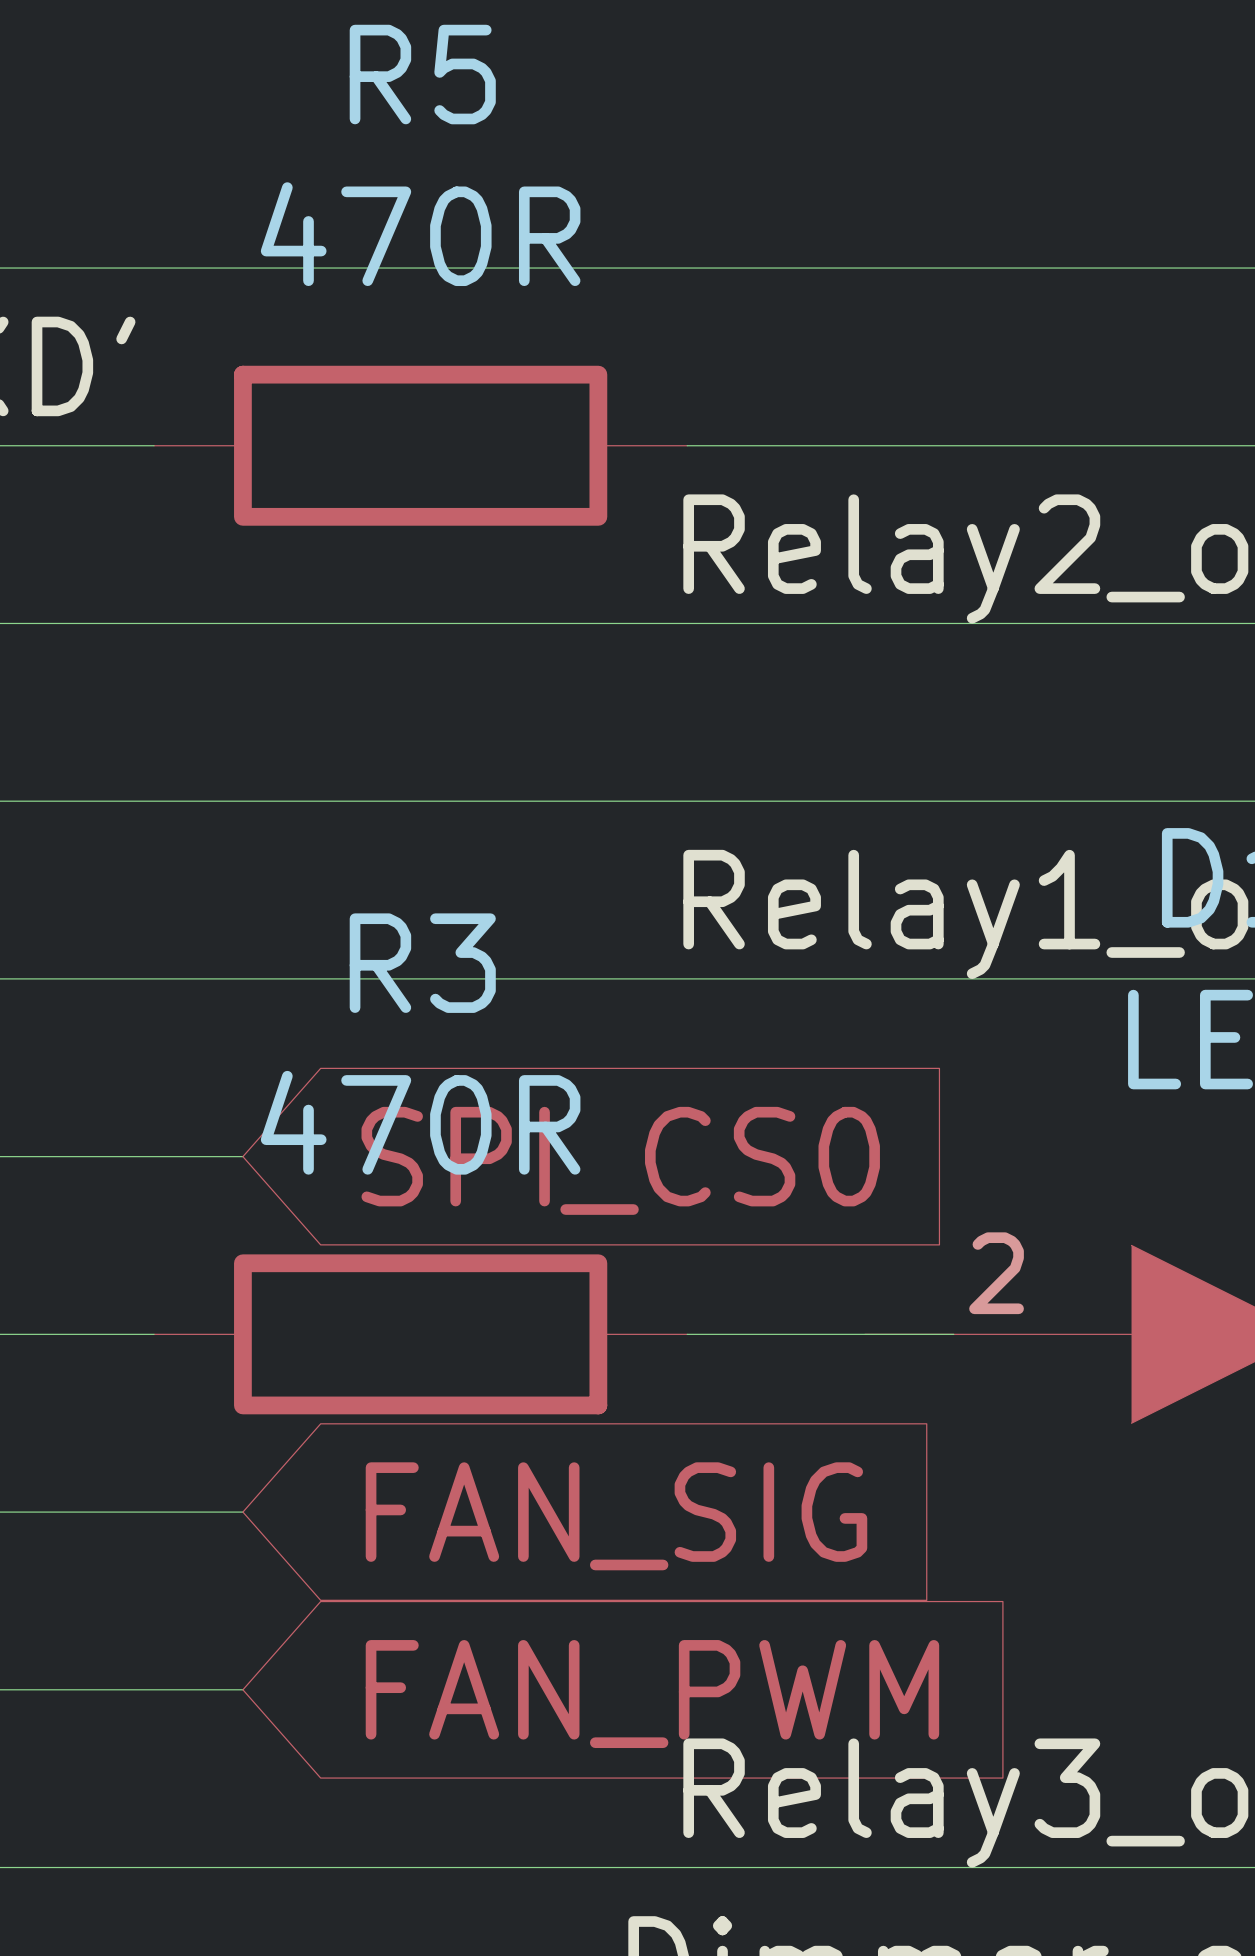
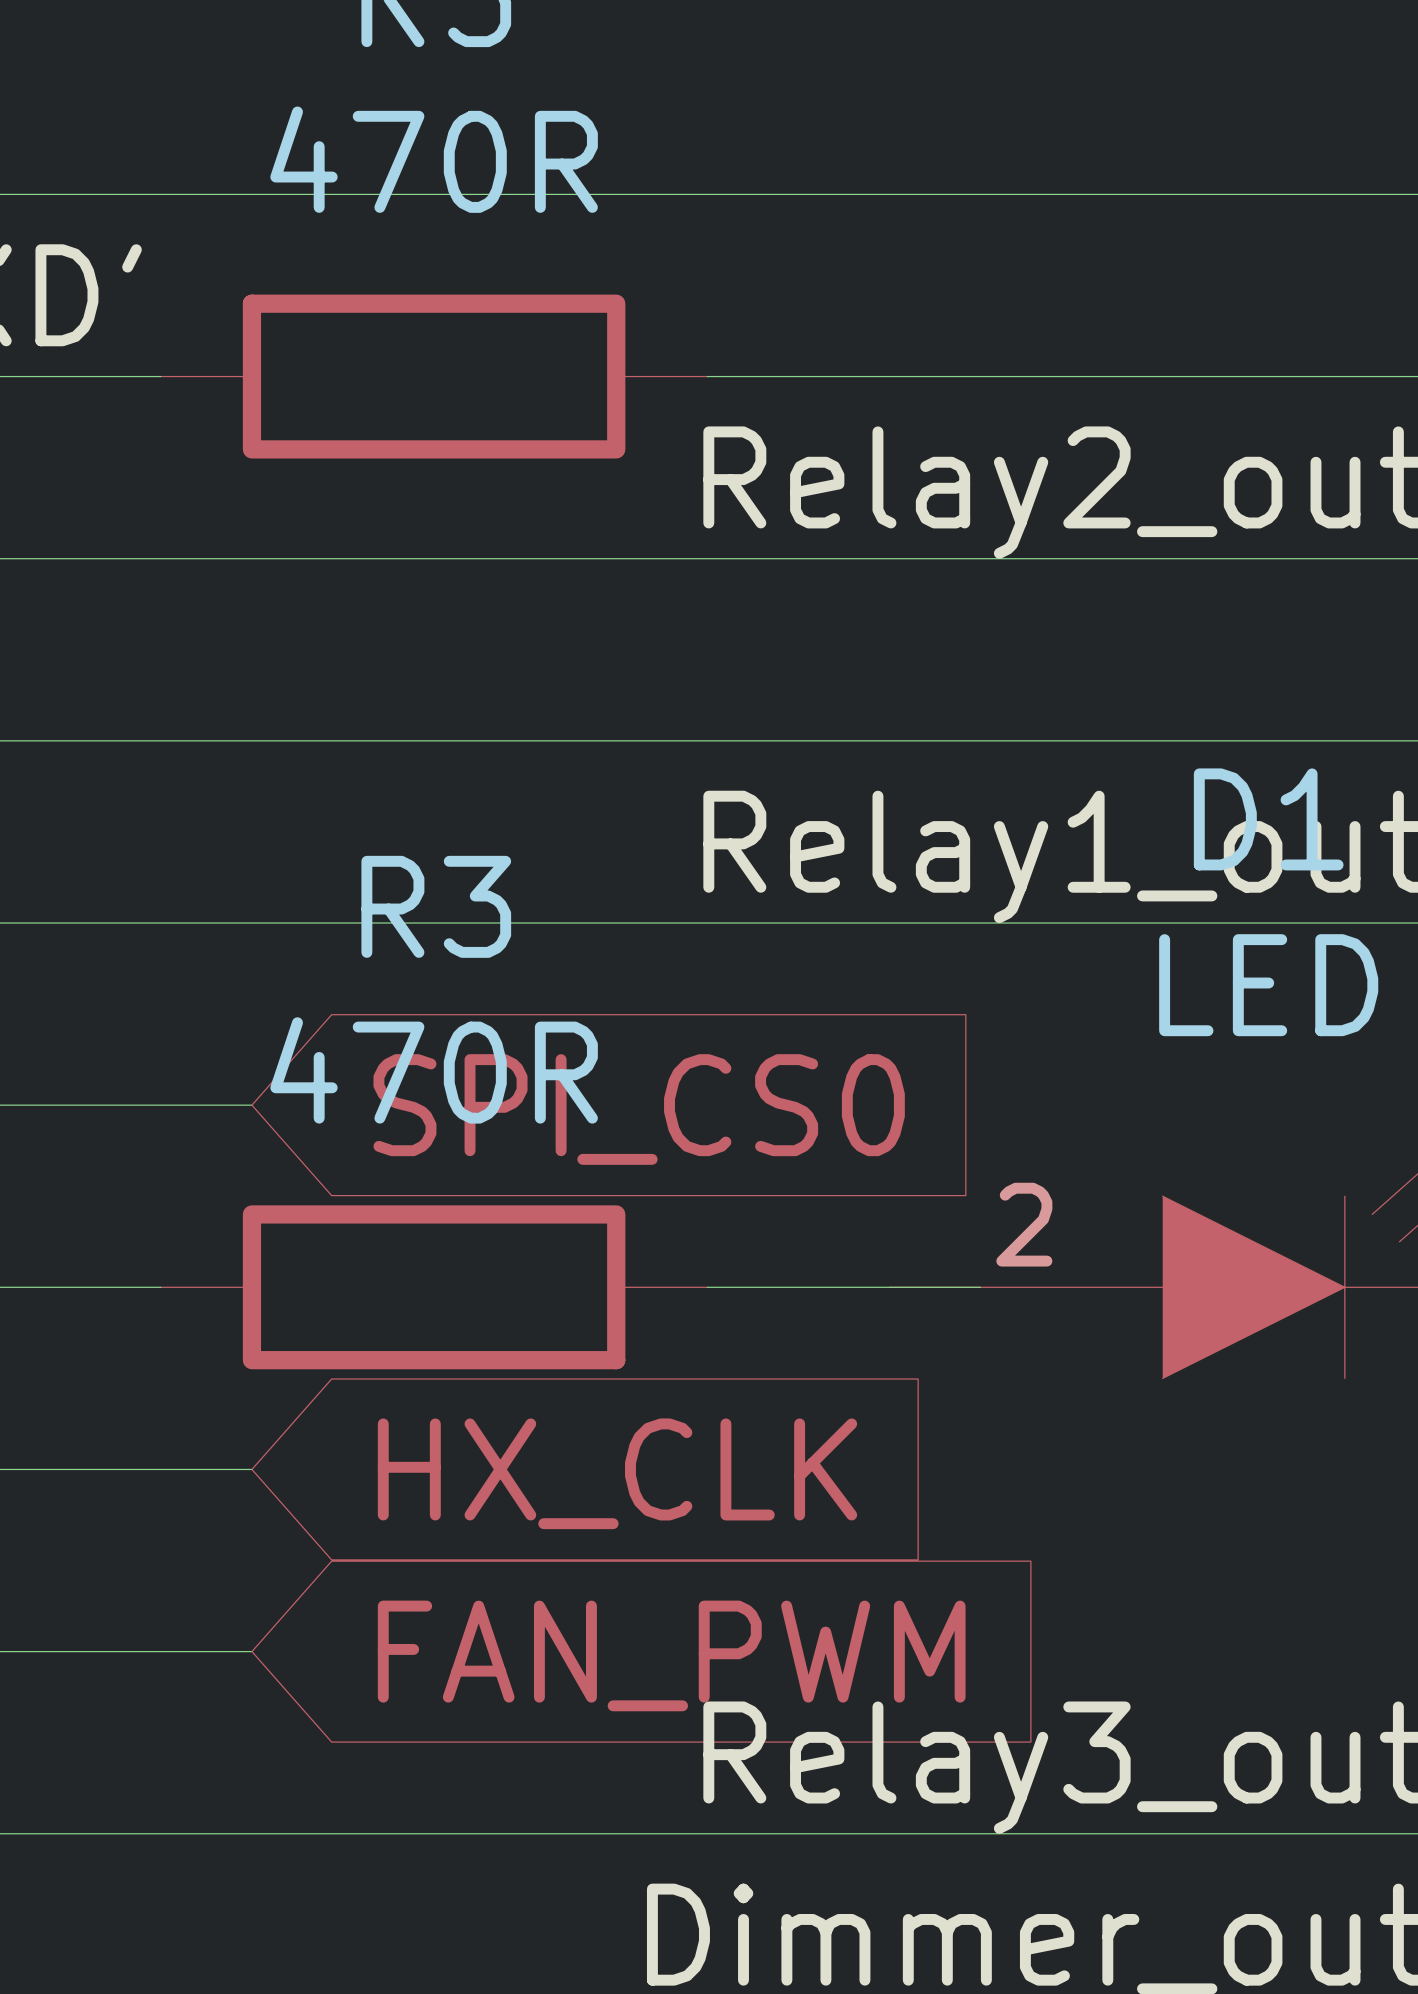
global label: FAN_SIG (616, 1516) -> HX_CLK (617, 1473)

